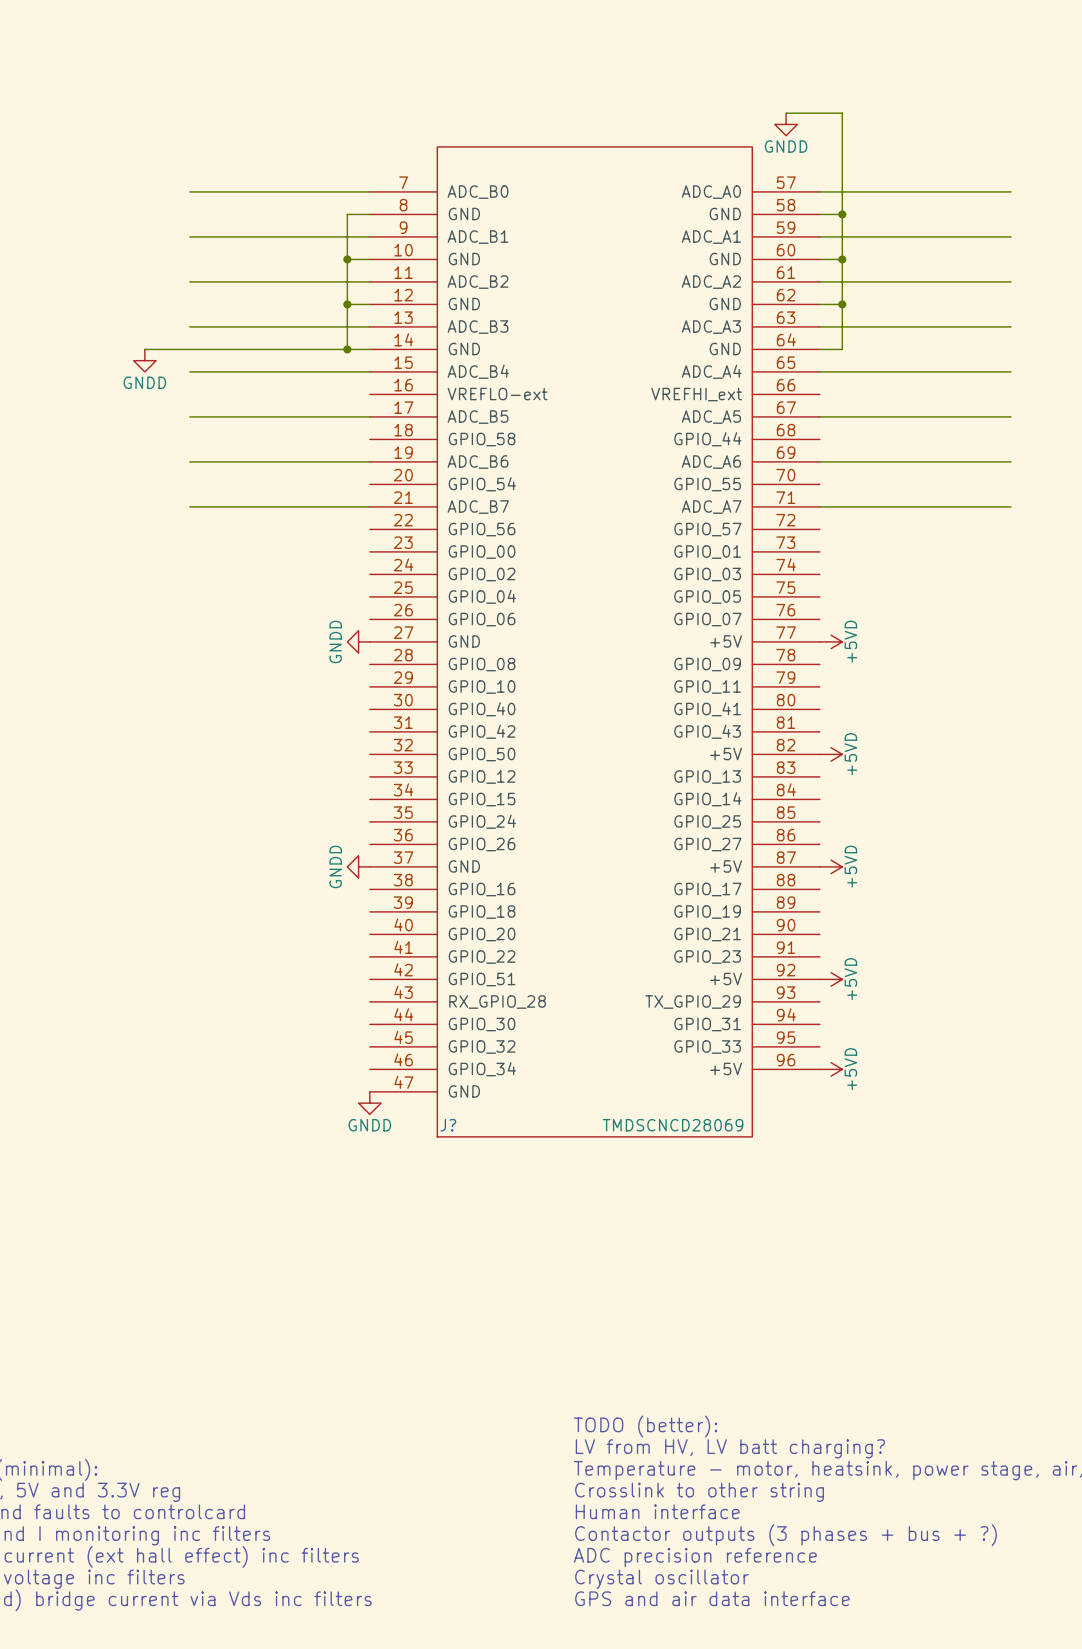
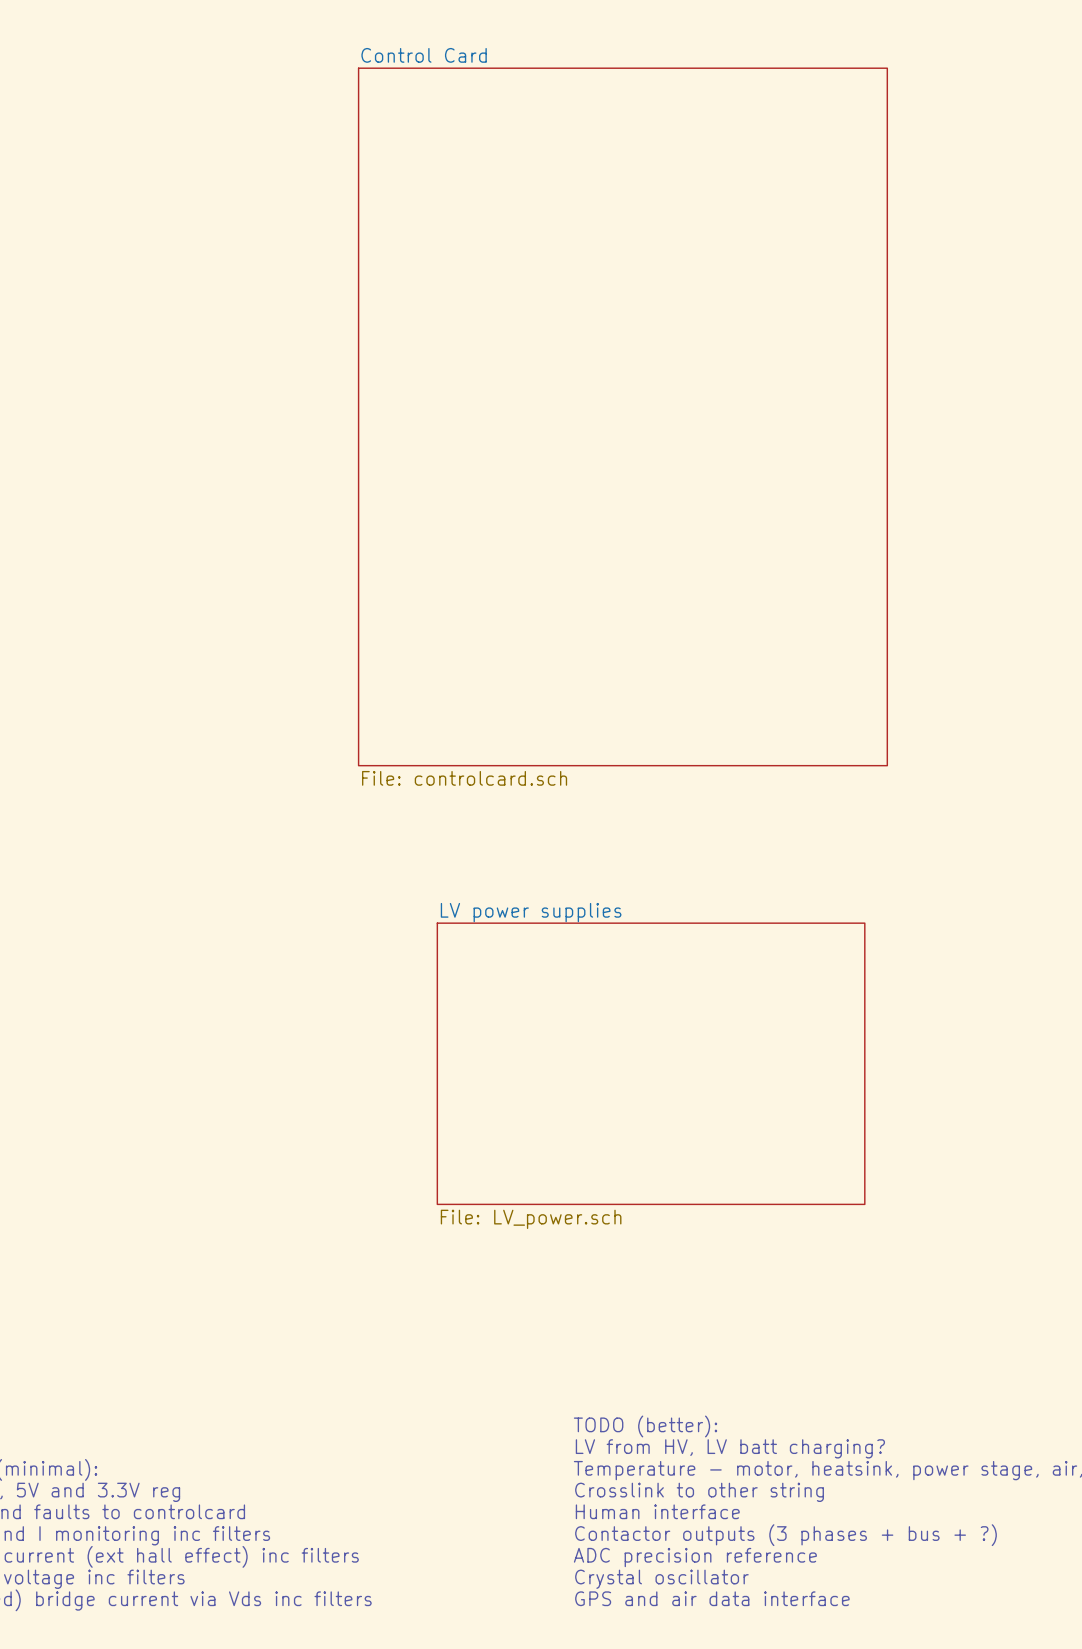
wire: (786, 113) (842, 113) (842, 349) (819, 349) -> none
power symbol: GNDD (786, 124) -> none
wire: (189, 191) (369, 191) -> none
wire: (819, 191) (1011, 191) -> none
wire: (369, 214) (347, 214) (347, 349) -> none
wire: (819, 214) (842, 214) -> none
junction: (842, 214) -> none
wire: (189, 236) (369, 236) -> none
wire: (819, 236) (1011, 236) -> none
wire: (347, 259) (369, 259) -> none
junction: (347, 259) -> none
wire: (819, 259) (842, 259) -> none
junction: (842, 259) -> none
wire: (189, 281) (369, 281) -> none
wire: (819, 281) (1011, 281) -> none
wire: (347, 304) (369, 304) -> none
junction: (347, 304) -> none
wire: (819, 304) (842, 304) -> none
junction: (842, 304) -> none
wire: (189, 326) (369, 326) -> none
wire: (819, 326) (1011, 326) -> none
wire: (144, 349) (369, 349) -> none
junction: (347, 349) -> none
power symbol: GNDD (144, 360) -> none
wire: (189, 371) (369, 371) -> none
wire: (819, 371) (1011, 371) -> none
wire: (189, 416) (369, 416) -> none
sheet Control Card: none -> File: controlcard.sch (622, 416)
wire: (819, 416) (1011, 416) -> none
wire: (189, 461) (369, 461) -> none
wire: (819, 461) (1011, 461) -> none
wire: (189, 506) (369, 506) -> none
wire: (819, 506) (1011, 506) -> none
power symbol: GNDD (358, 641) -> none
J?: TMDSCNCD28069 (594, 641) -> none
power symbol: +5VD (831, 641) -> none
power symbol: +5VD (831, 754) -> none
power symbol: GNDD (358, 866) -> none
power symbol: +5VD (831, 866) -> none
power symbol: +5VD (831, 979) -> none
sheet LV power supplies: none -> File: LV_power.sch (651, 1063)
power symbol: +5VD (831, 1069) -> none
power symbol: GNDD (369, 1103) -> none

